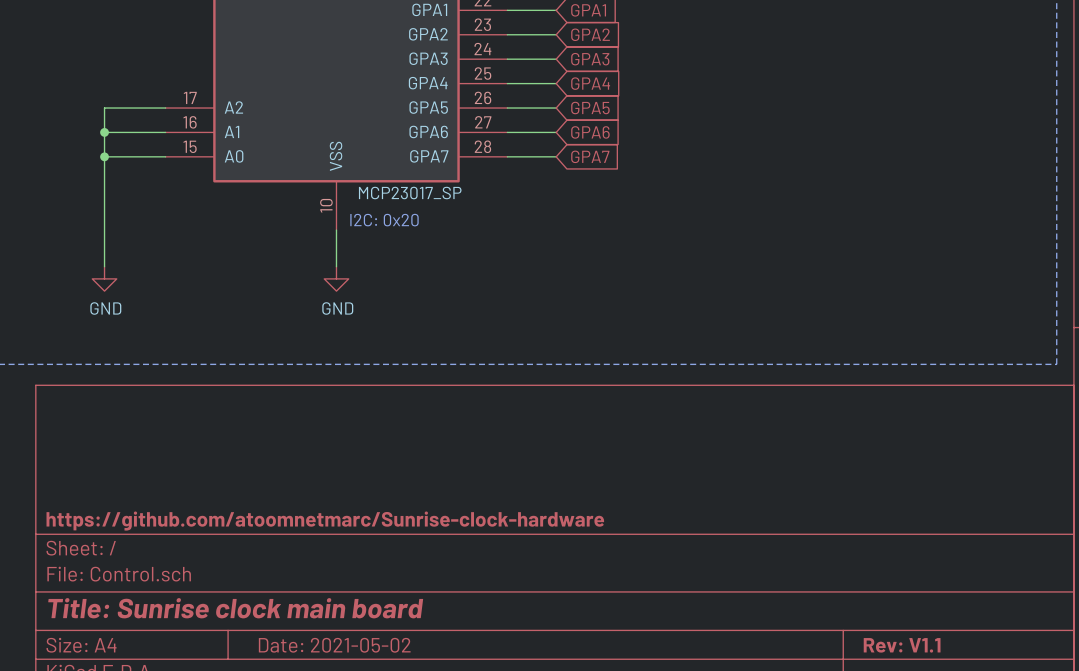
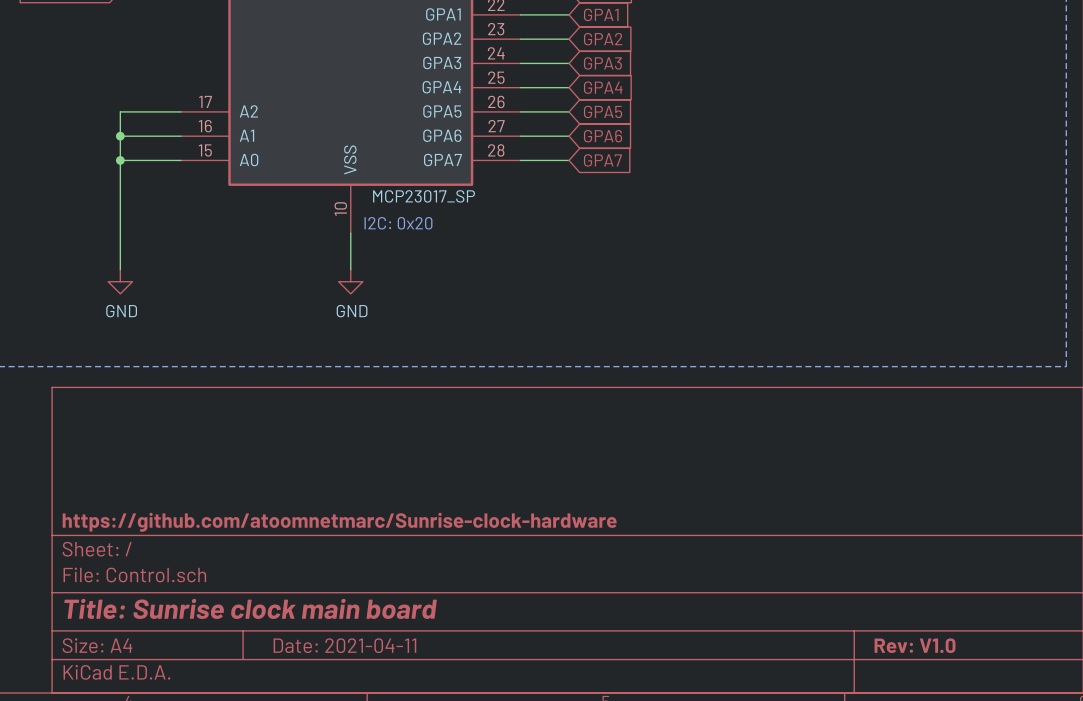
title block: Date: 2021-05-02 (334, 645) -> Date: 2021-04-11 (344, 645)
title block: Rev: V1.1 (902, 645) -> Rev: V1.0 (915, 645)

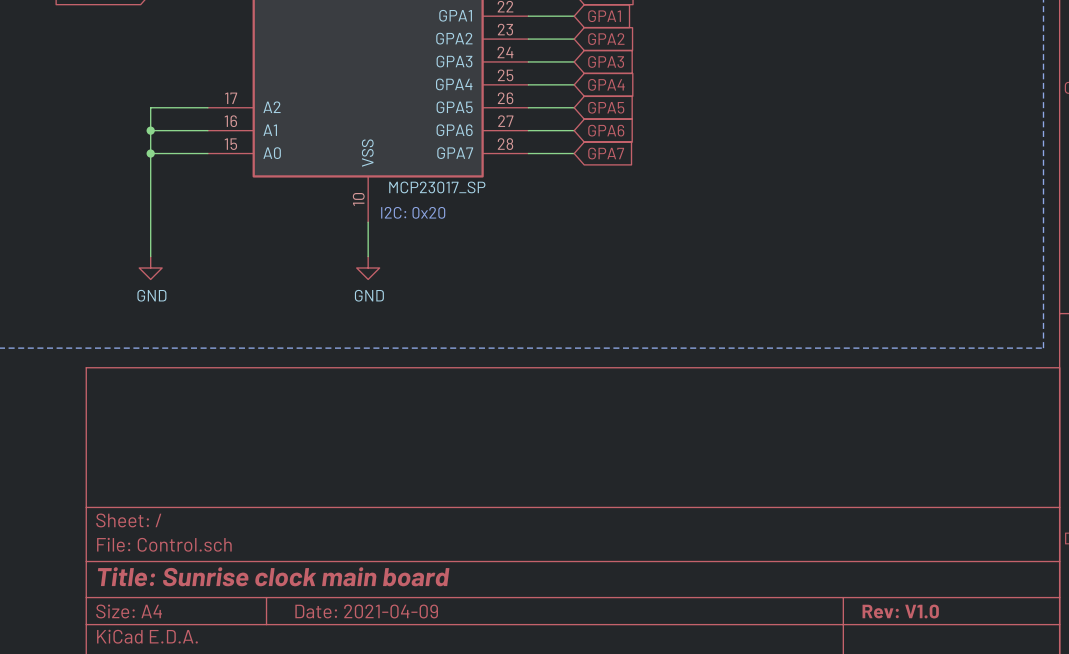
title block: https://github.com/atoomnetmarc/Sunrise-clock-hardware (339, 522) -> none
title block: Date: 2021-04-11 (344, 645) -> Date: 2021-04-09 (366, 611)

